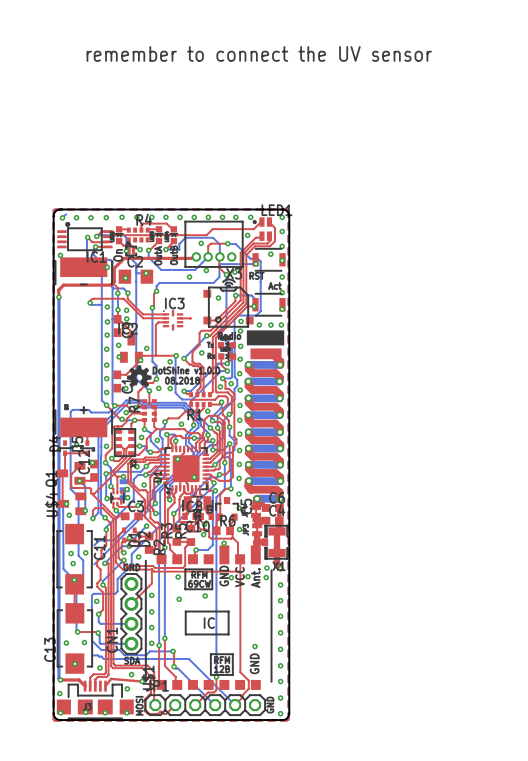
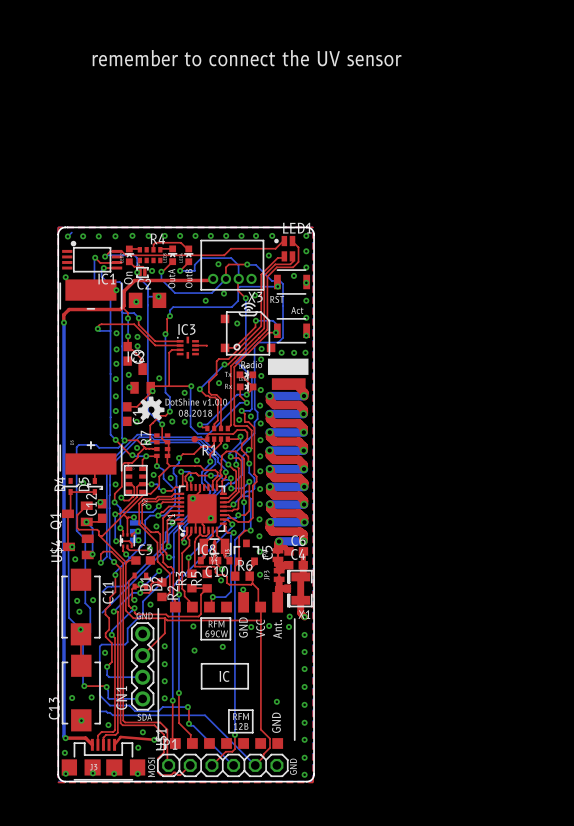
top track: none -> (194, 439) (207, 439)
part: none -> (194, 439)

